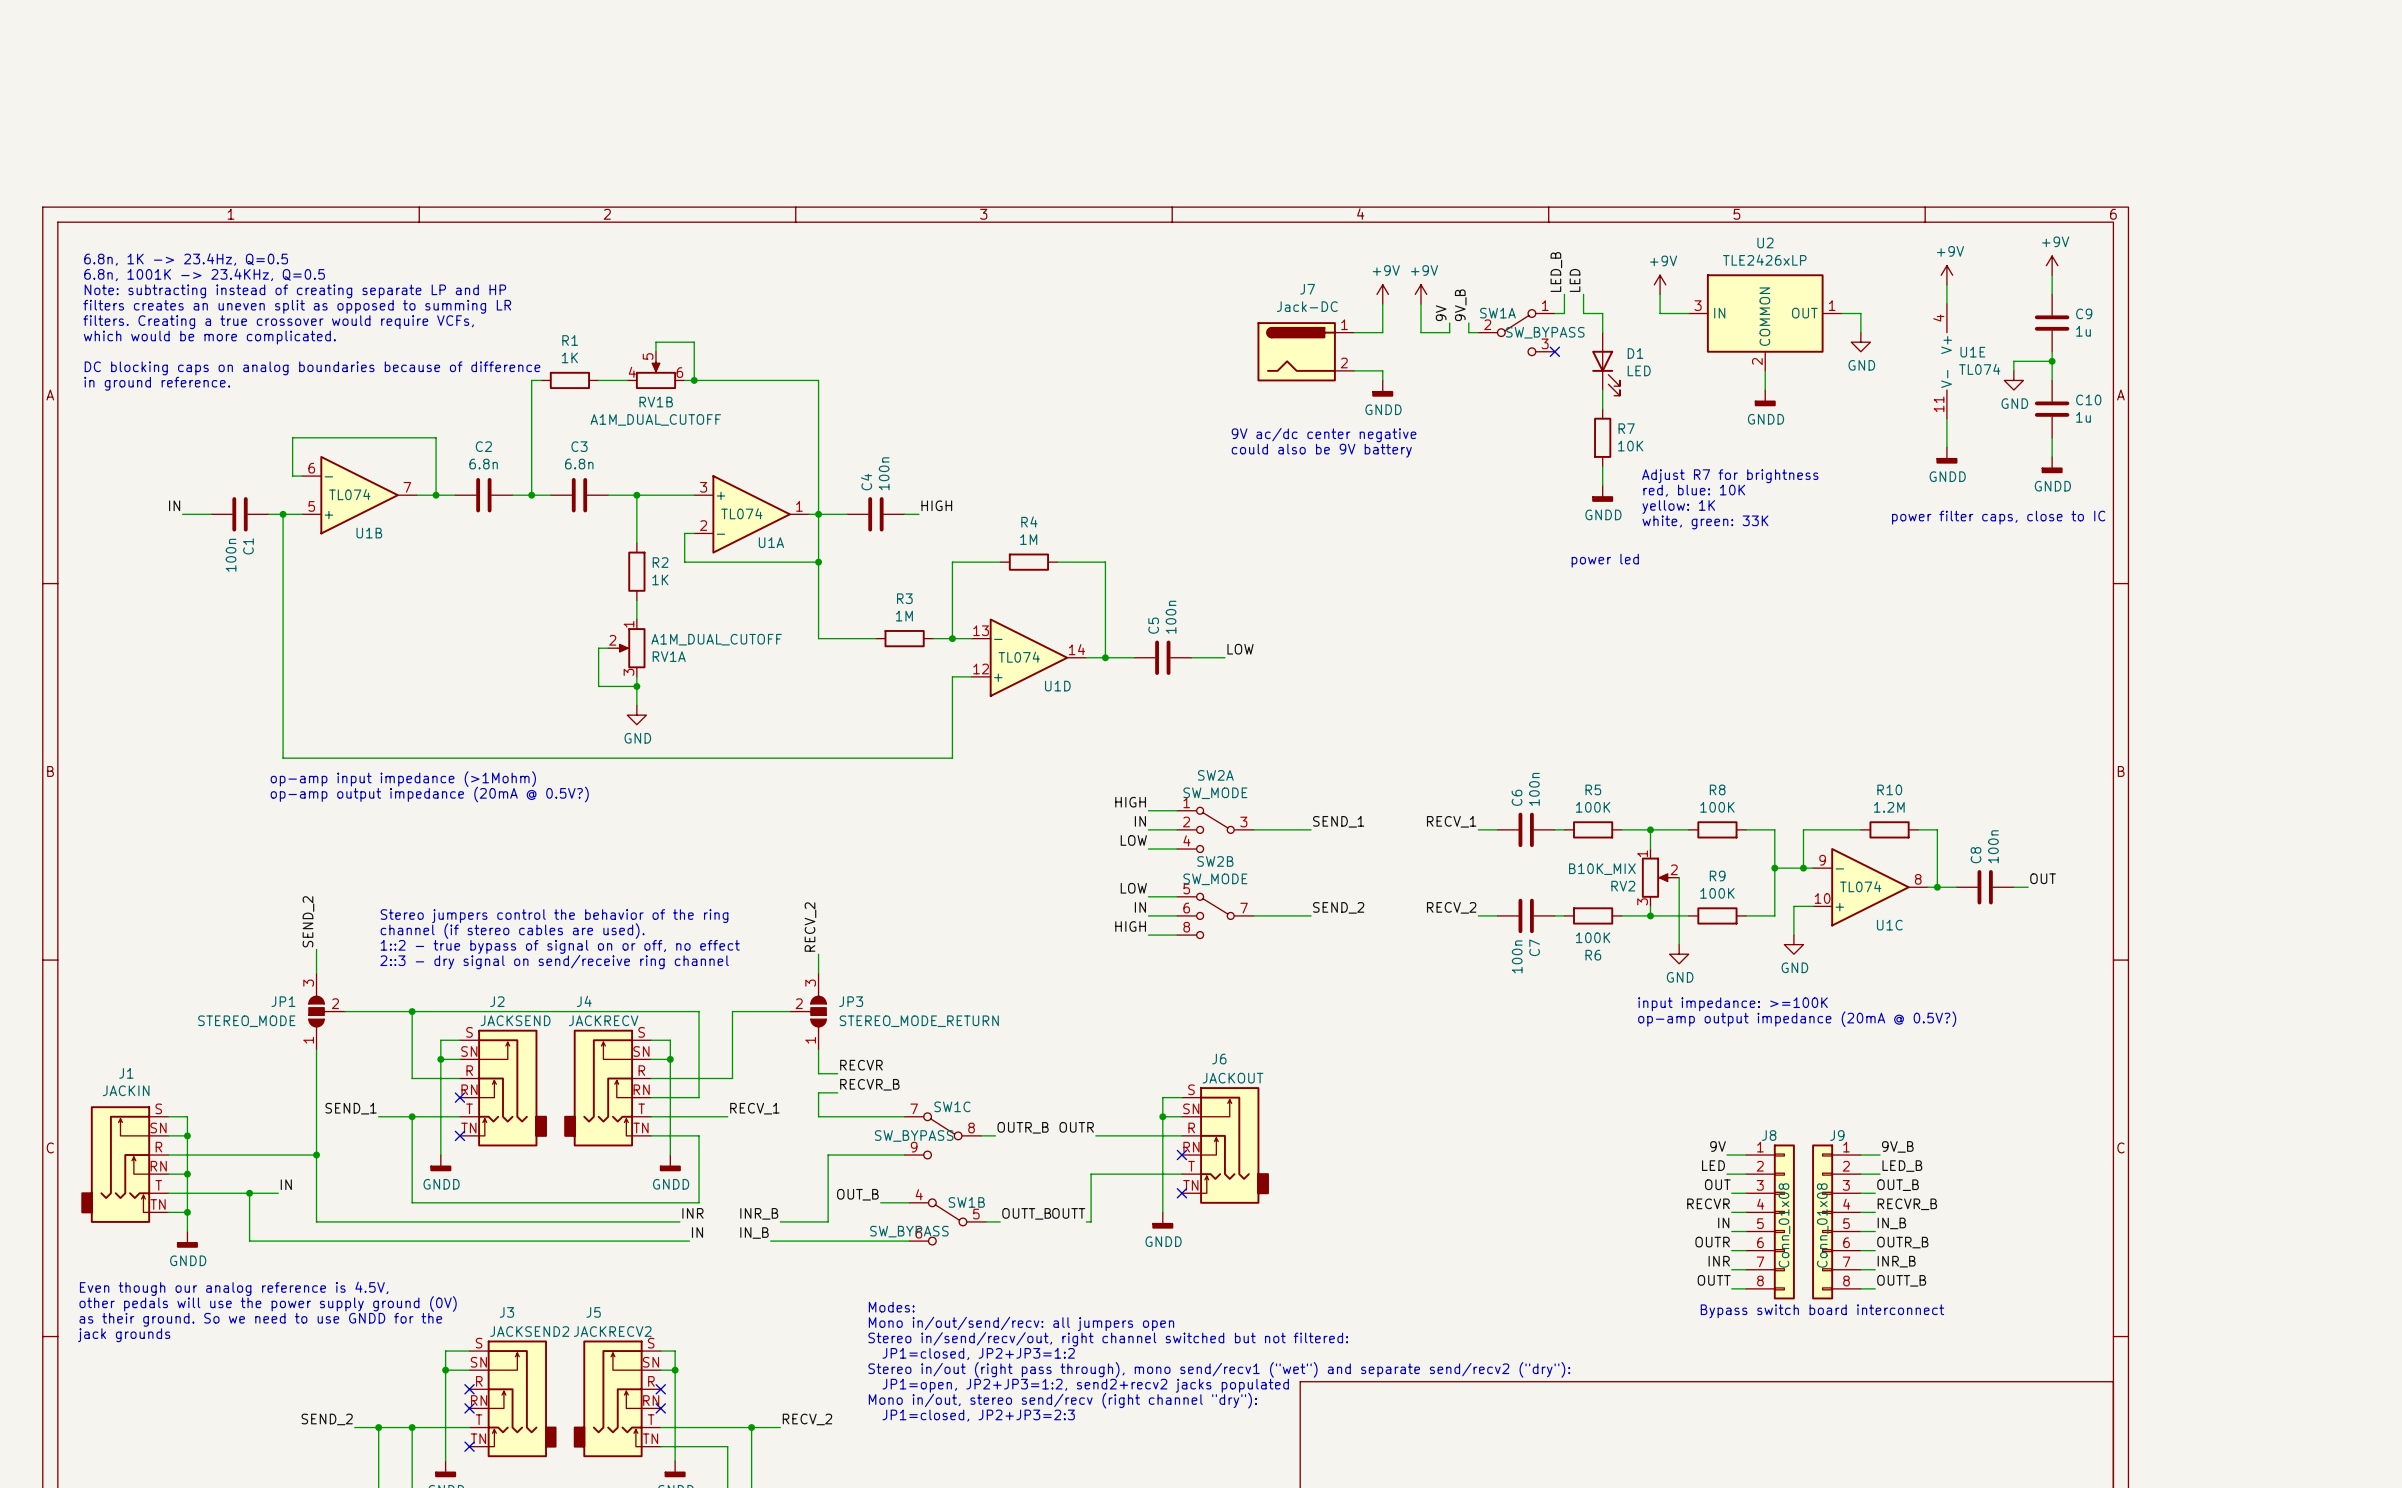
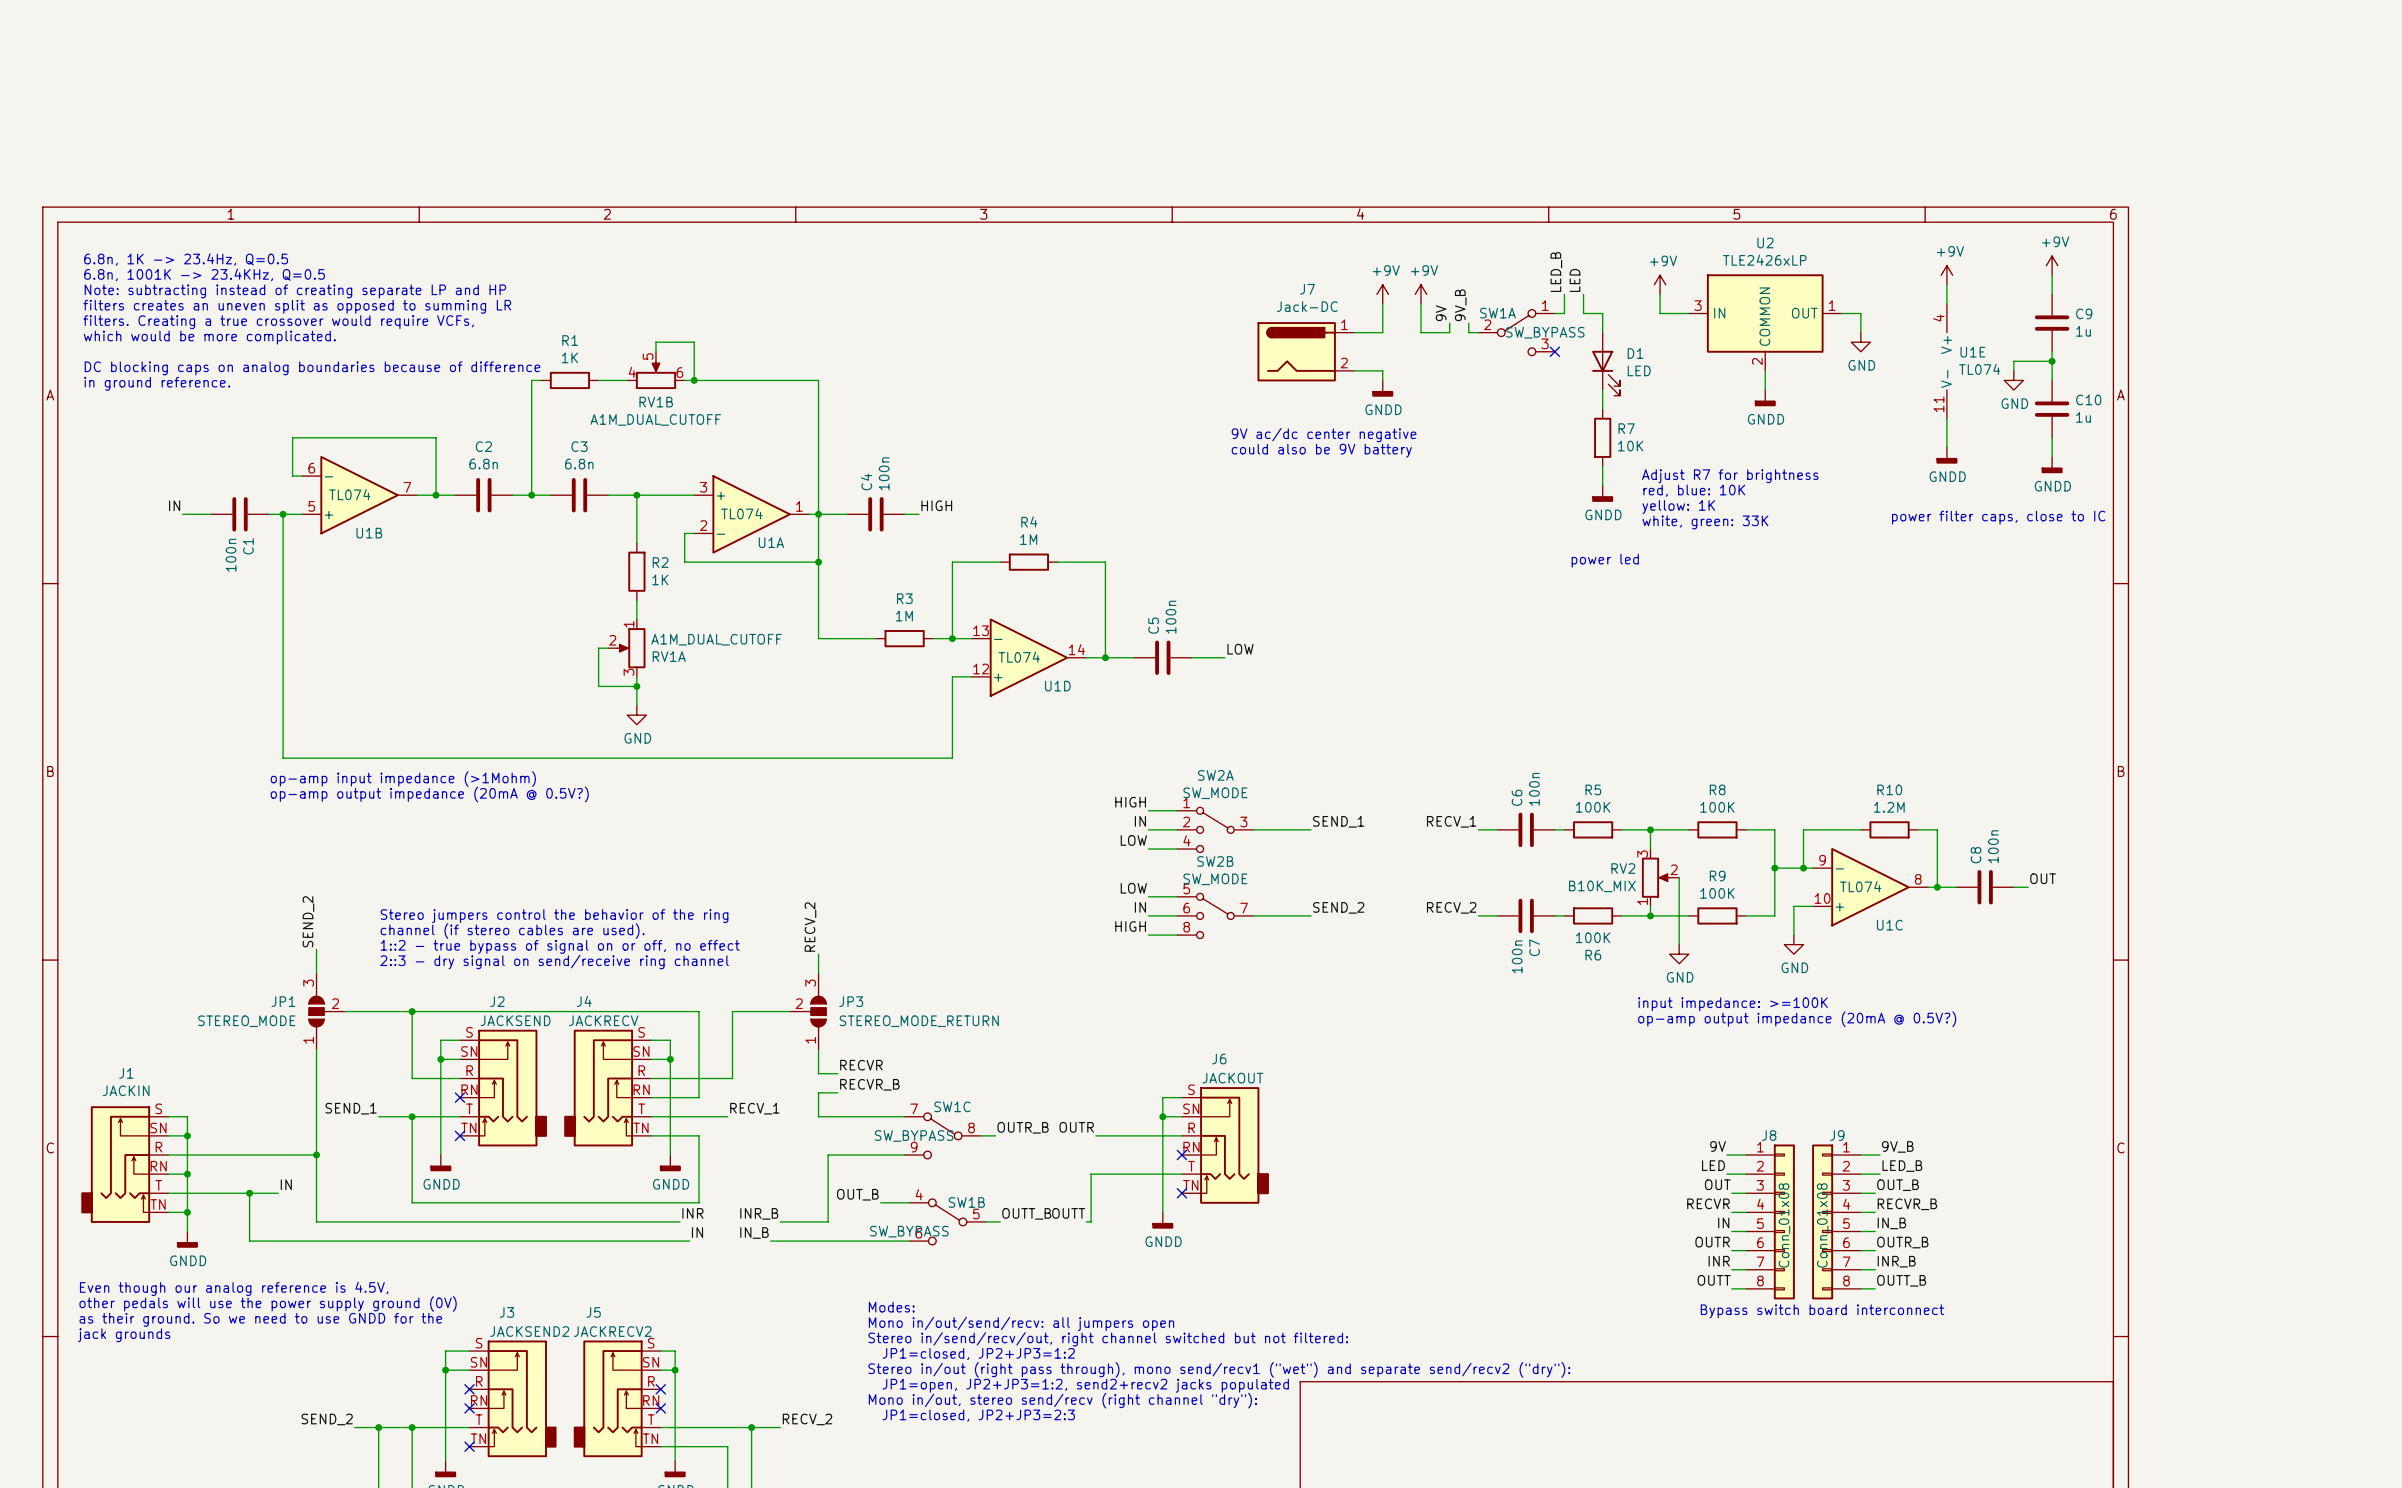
RV2 flip: as is (1655, 877) -> up-down (1655, 877)

